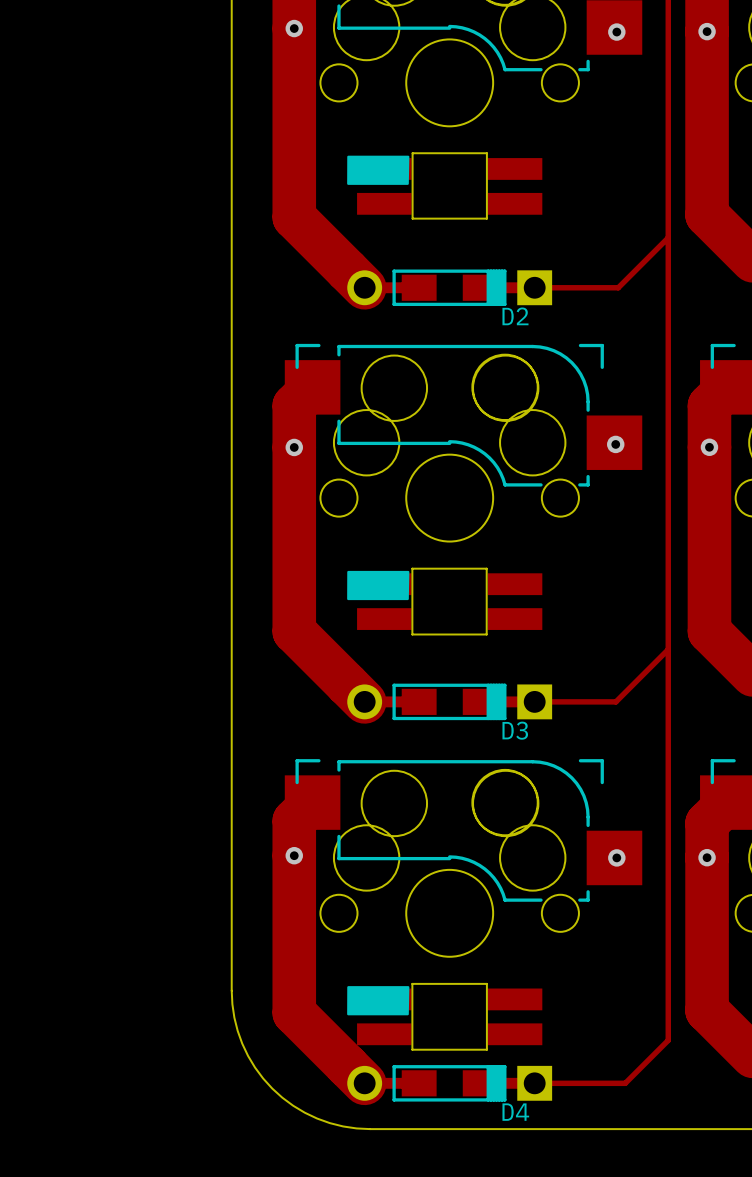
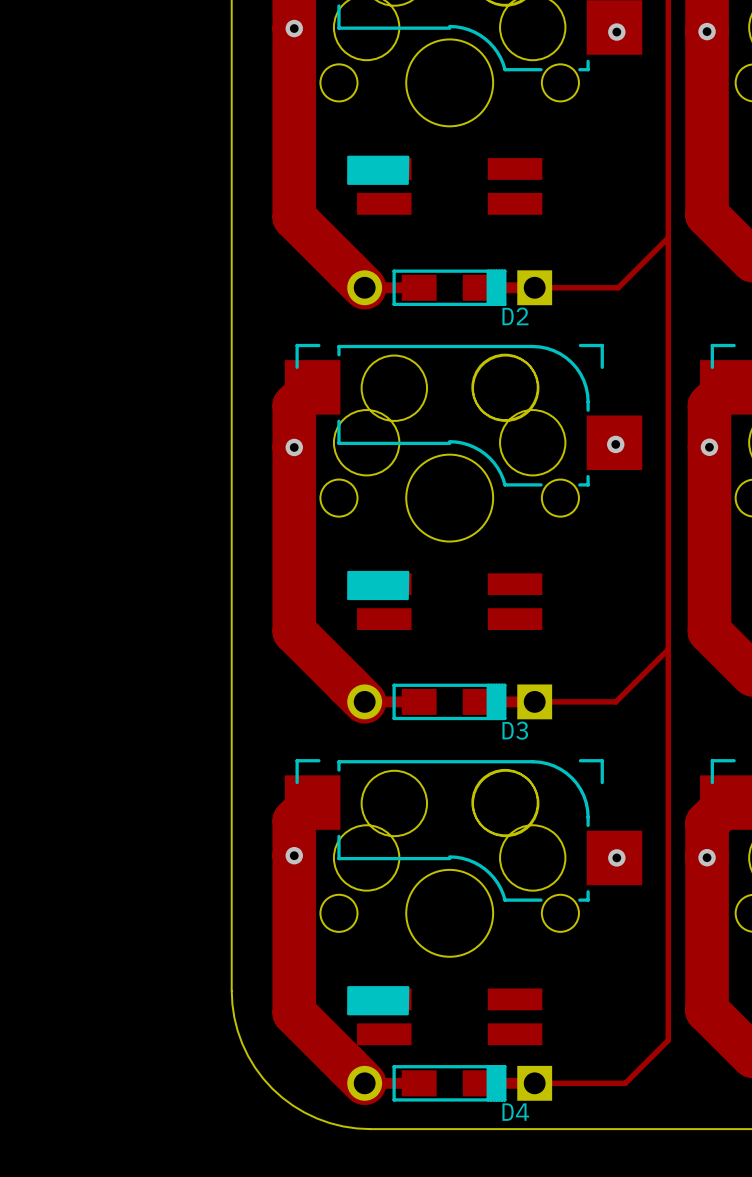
board edge: (412, 153) (412, 218) (486, 218) (486, 153) (412, 153) -> none
board edge: (412, 568) (412, 634) (486, 634) (486, 568) (412, 568) -> none
board edge: (412, 983) (412, 1049) (486, 1049) (486, 983) (412, 983) -> none

